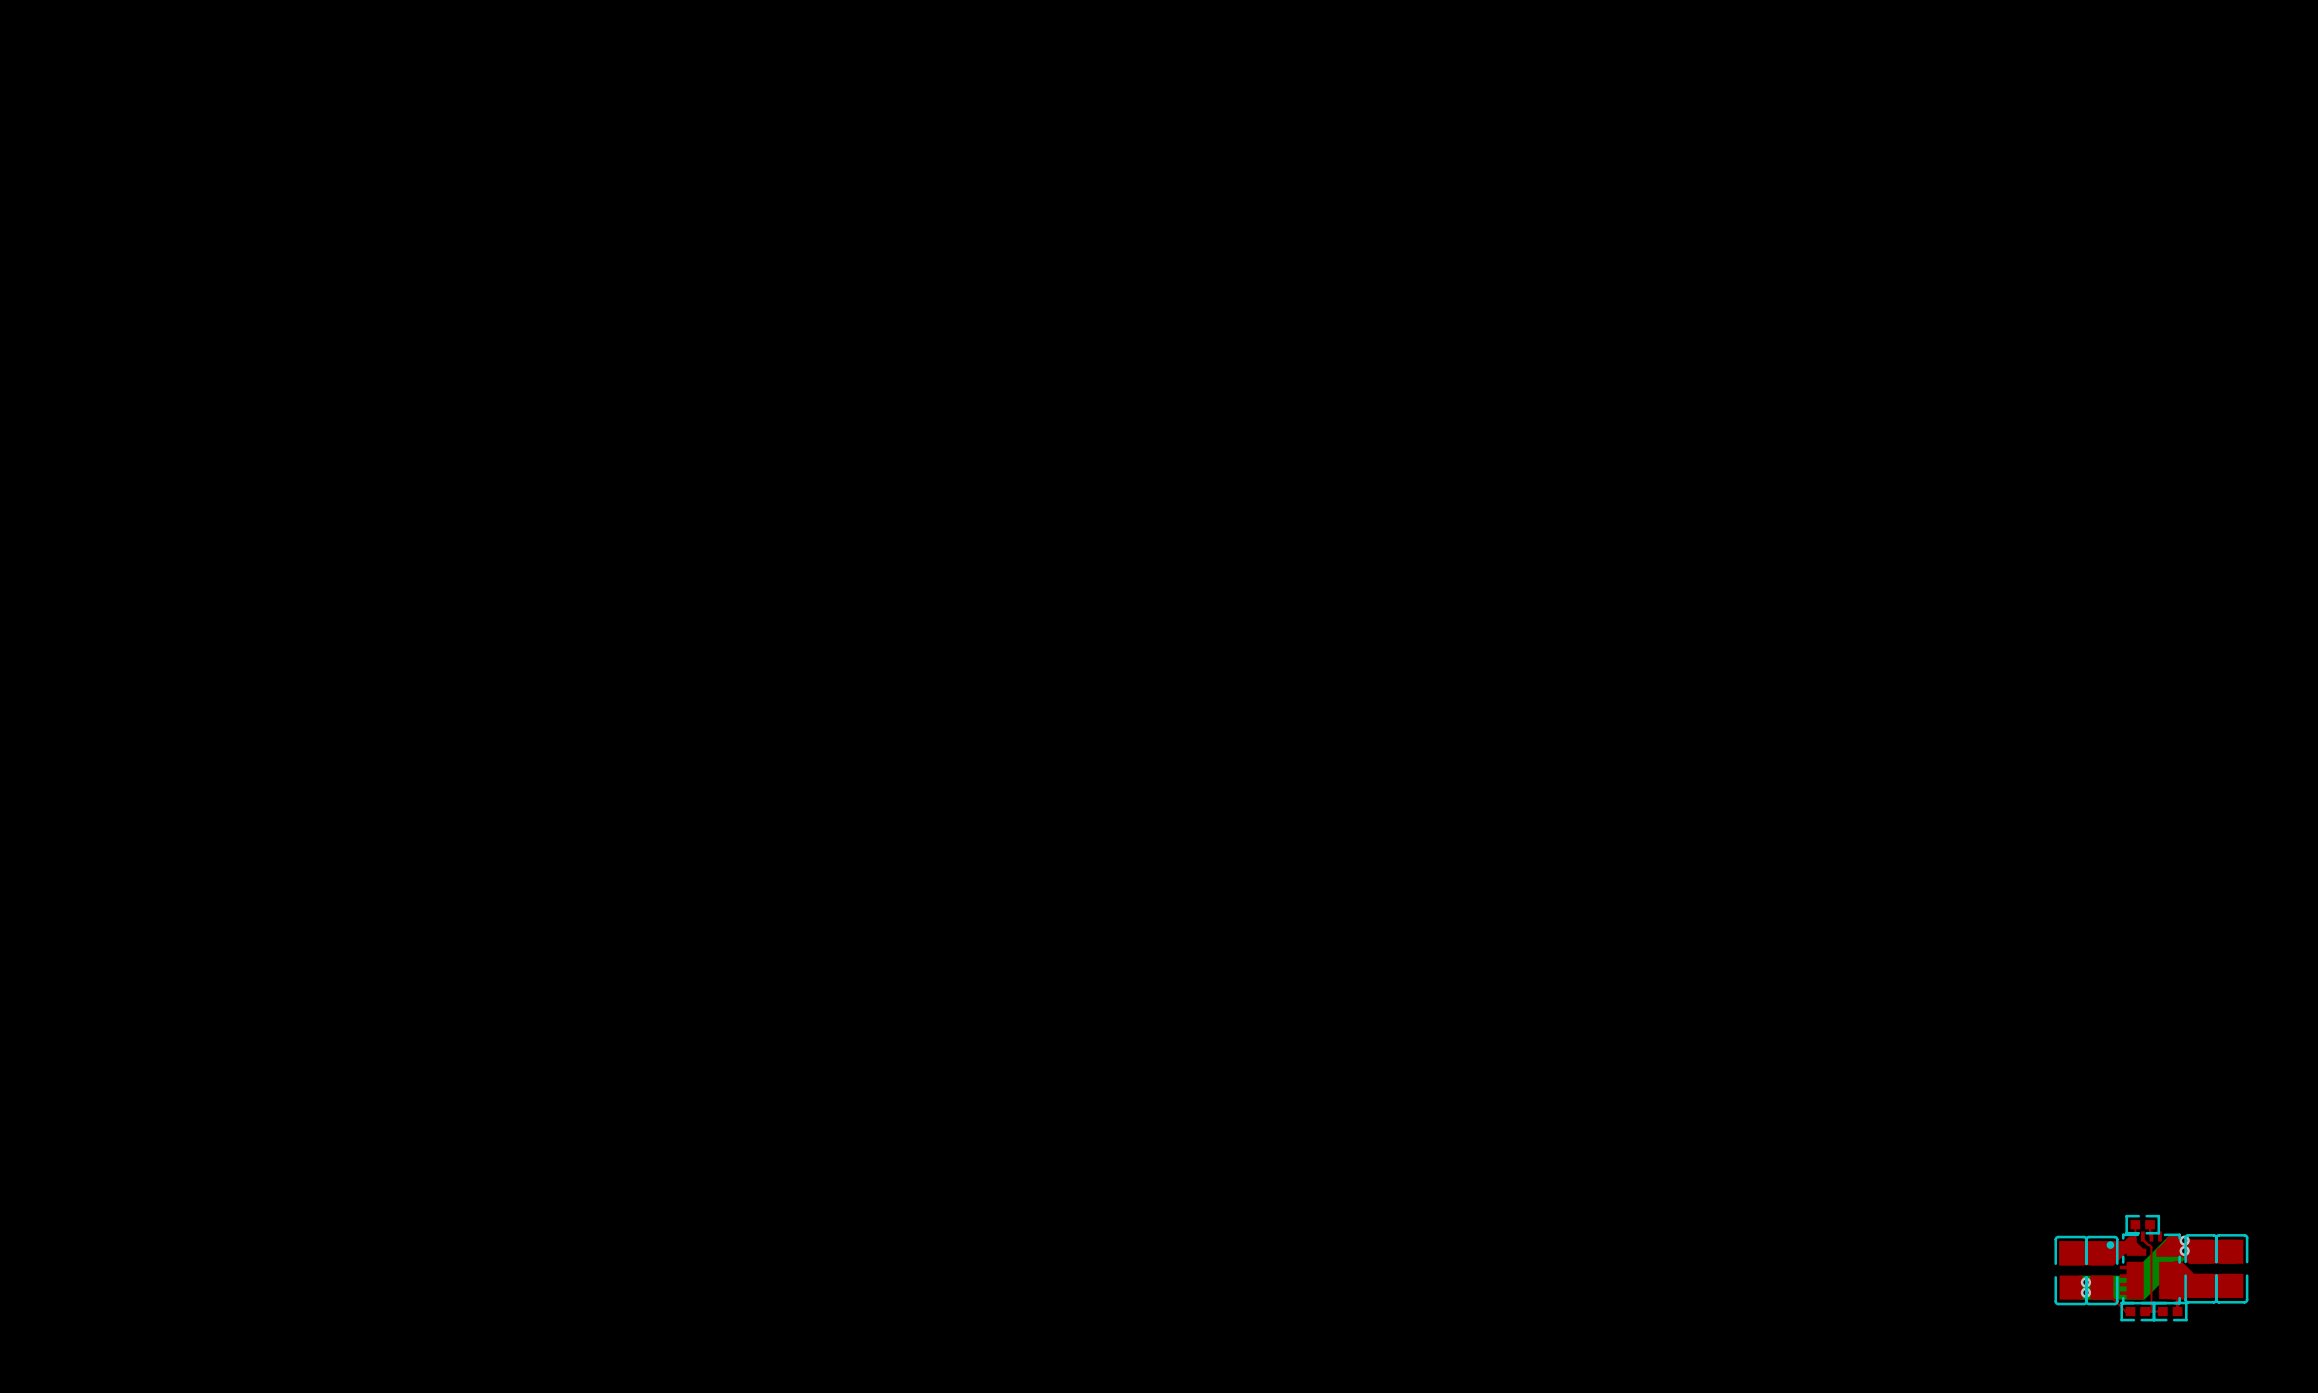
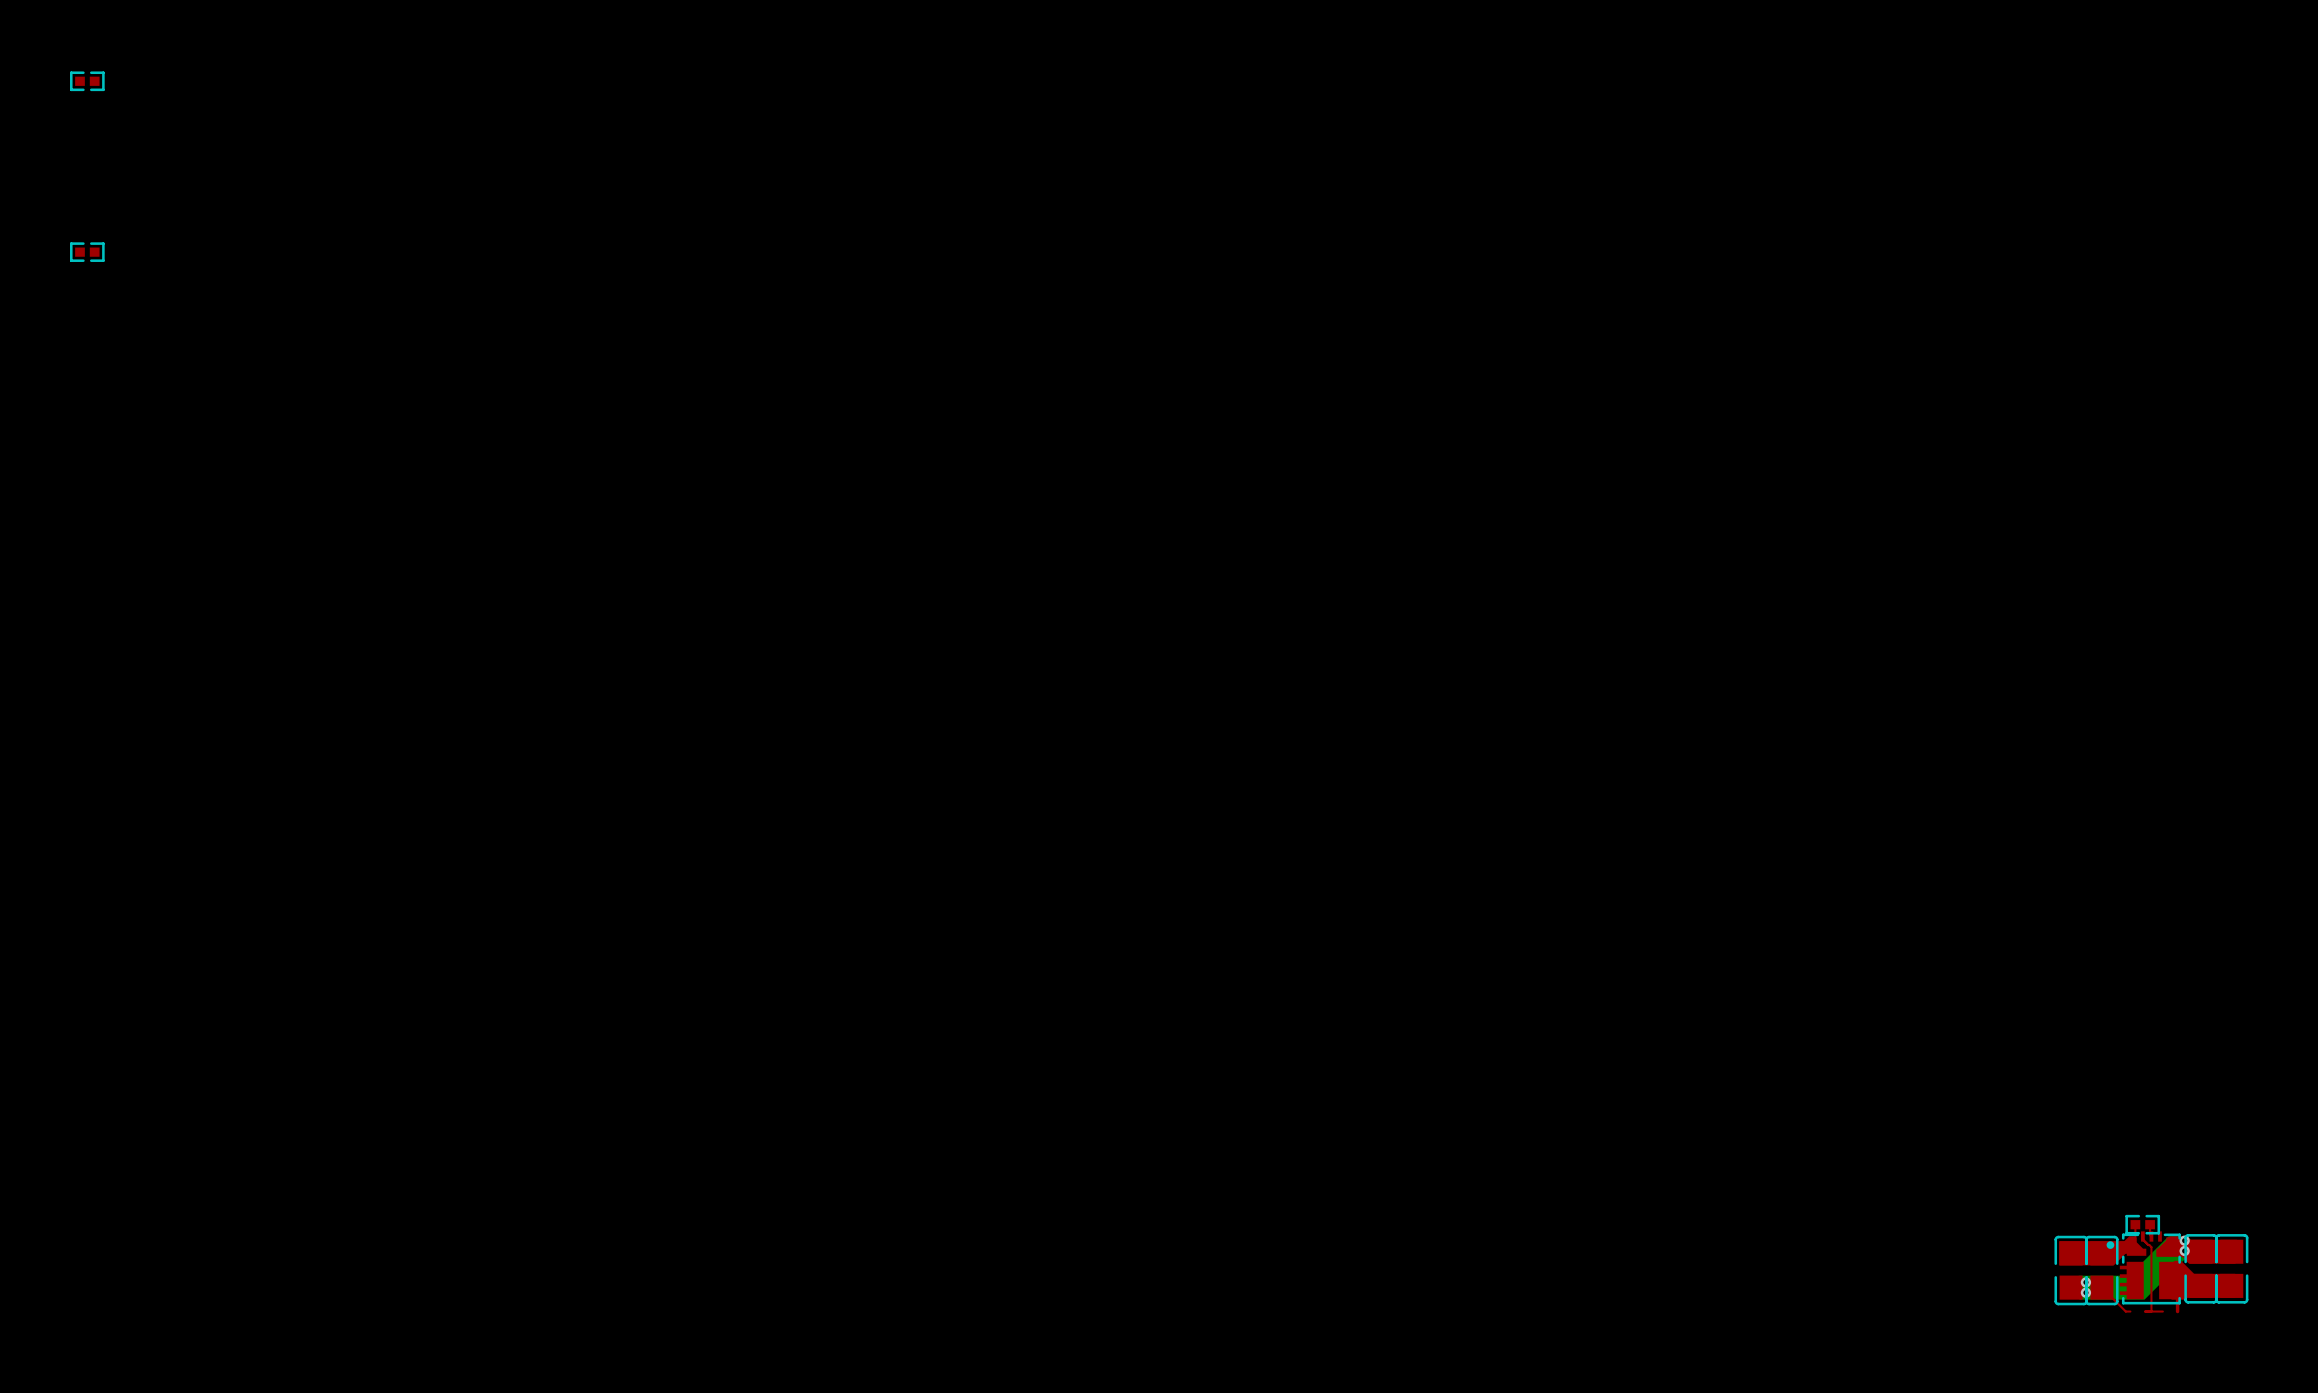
part: none -> (87, 81)
part: none -> (87, 252)
part: (2137, 1311) -> none
part: (2170, 1311) -> none

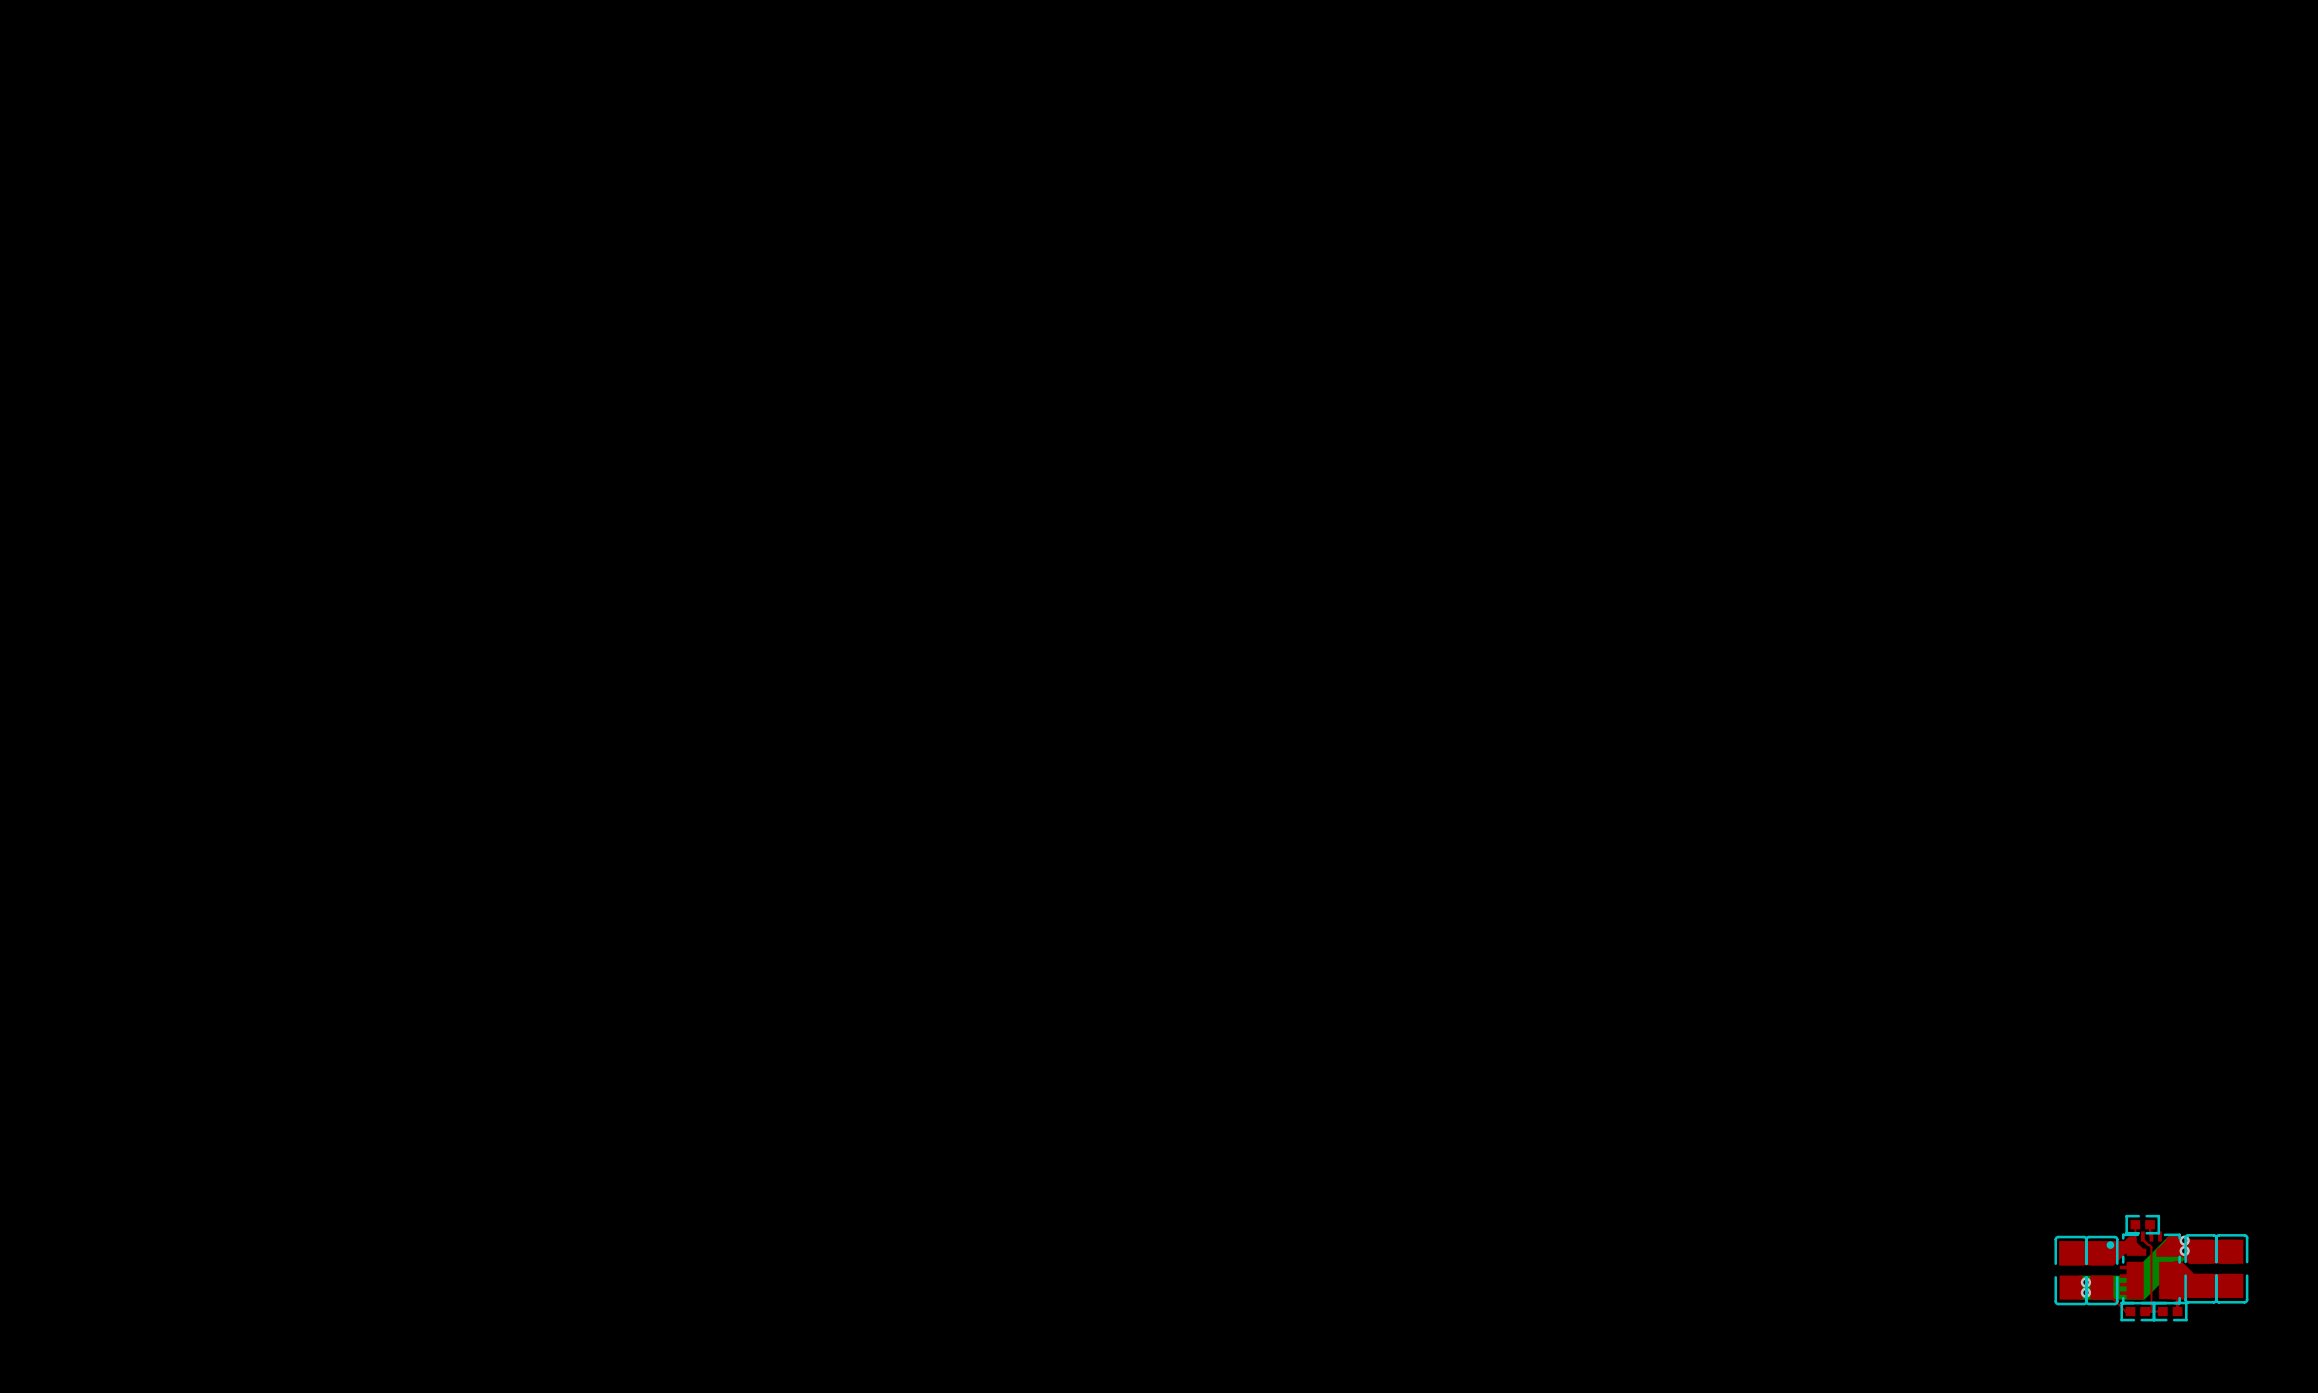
part: (87, 81) -> none
part: (87, 252) -> none
part: none -> (2137, 1311)
part: none -> (2170, 1311)

